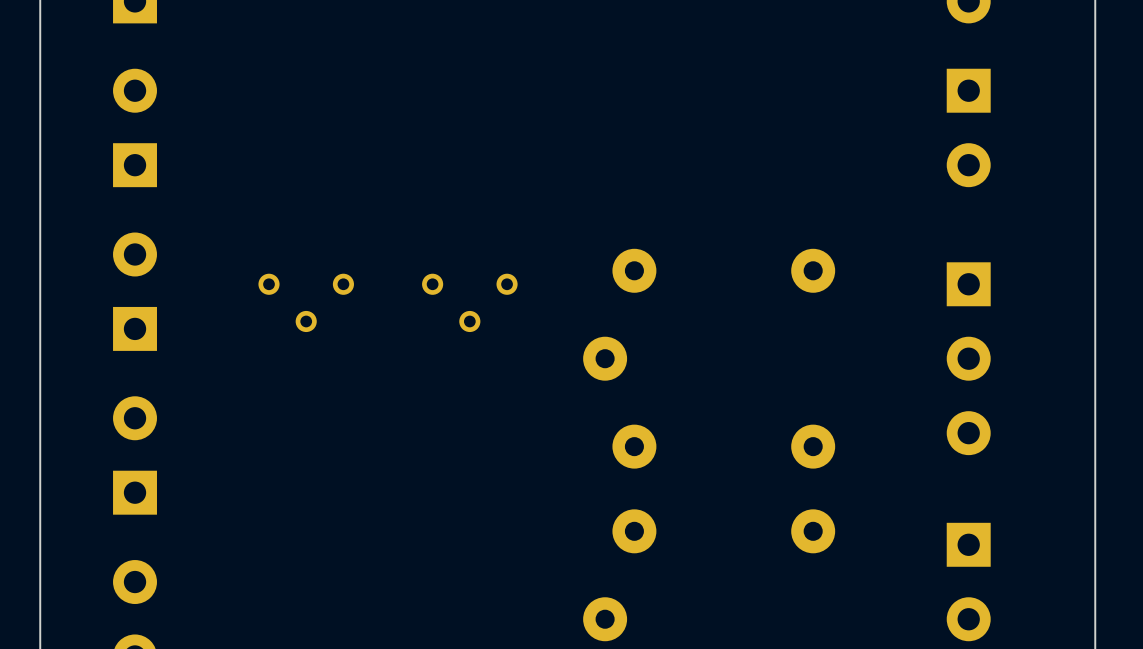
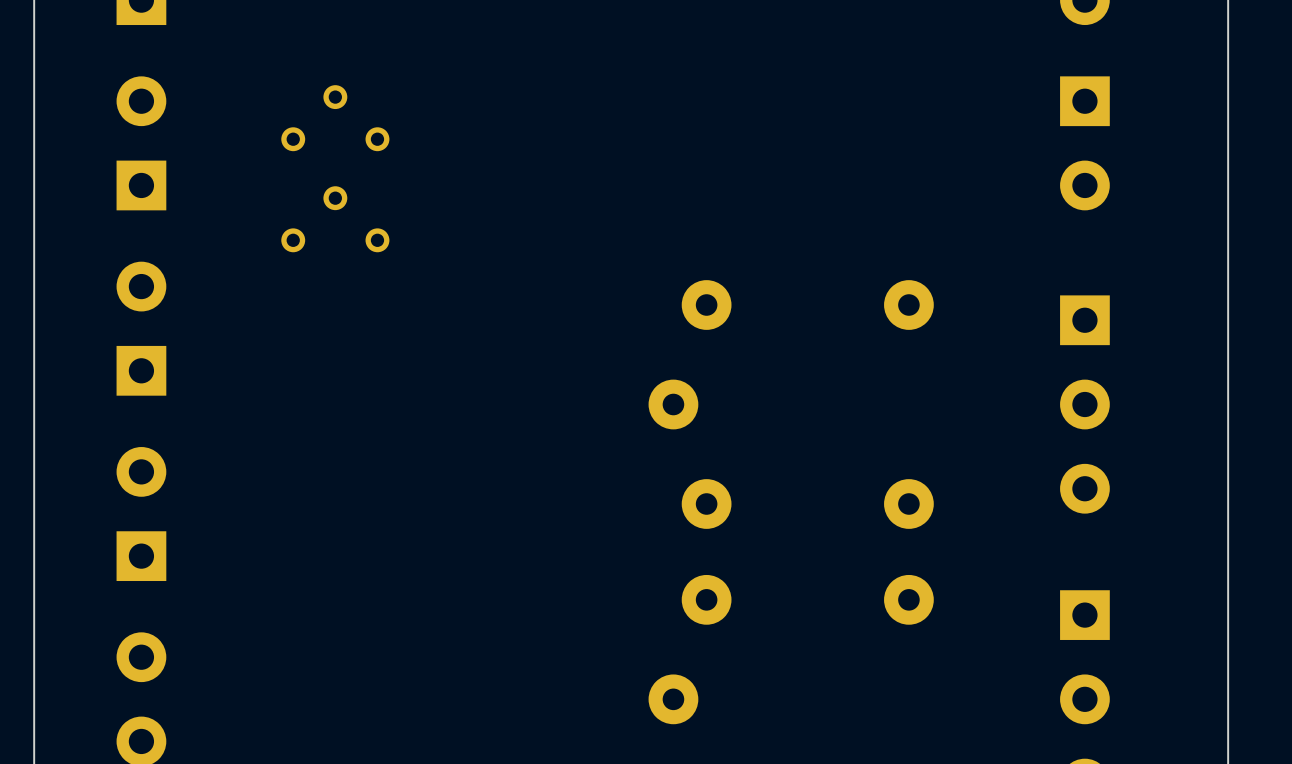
part: none -> (335, 118)
part: none -> (335, 219)
part: (306, 302) -> none
part: (469, 302) -> none

